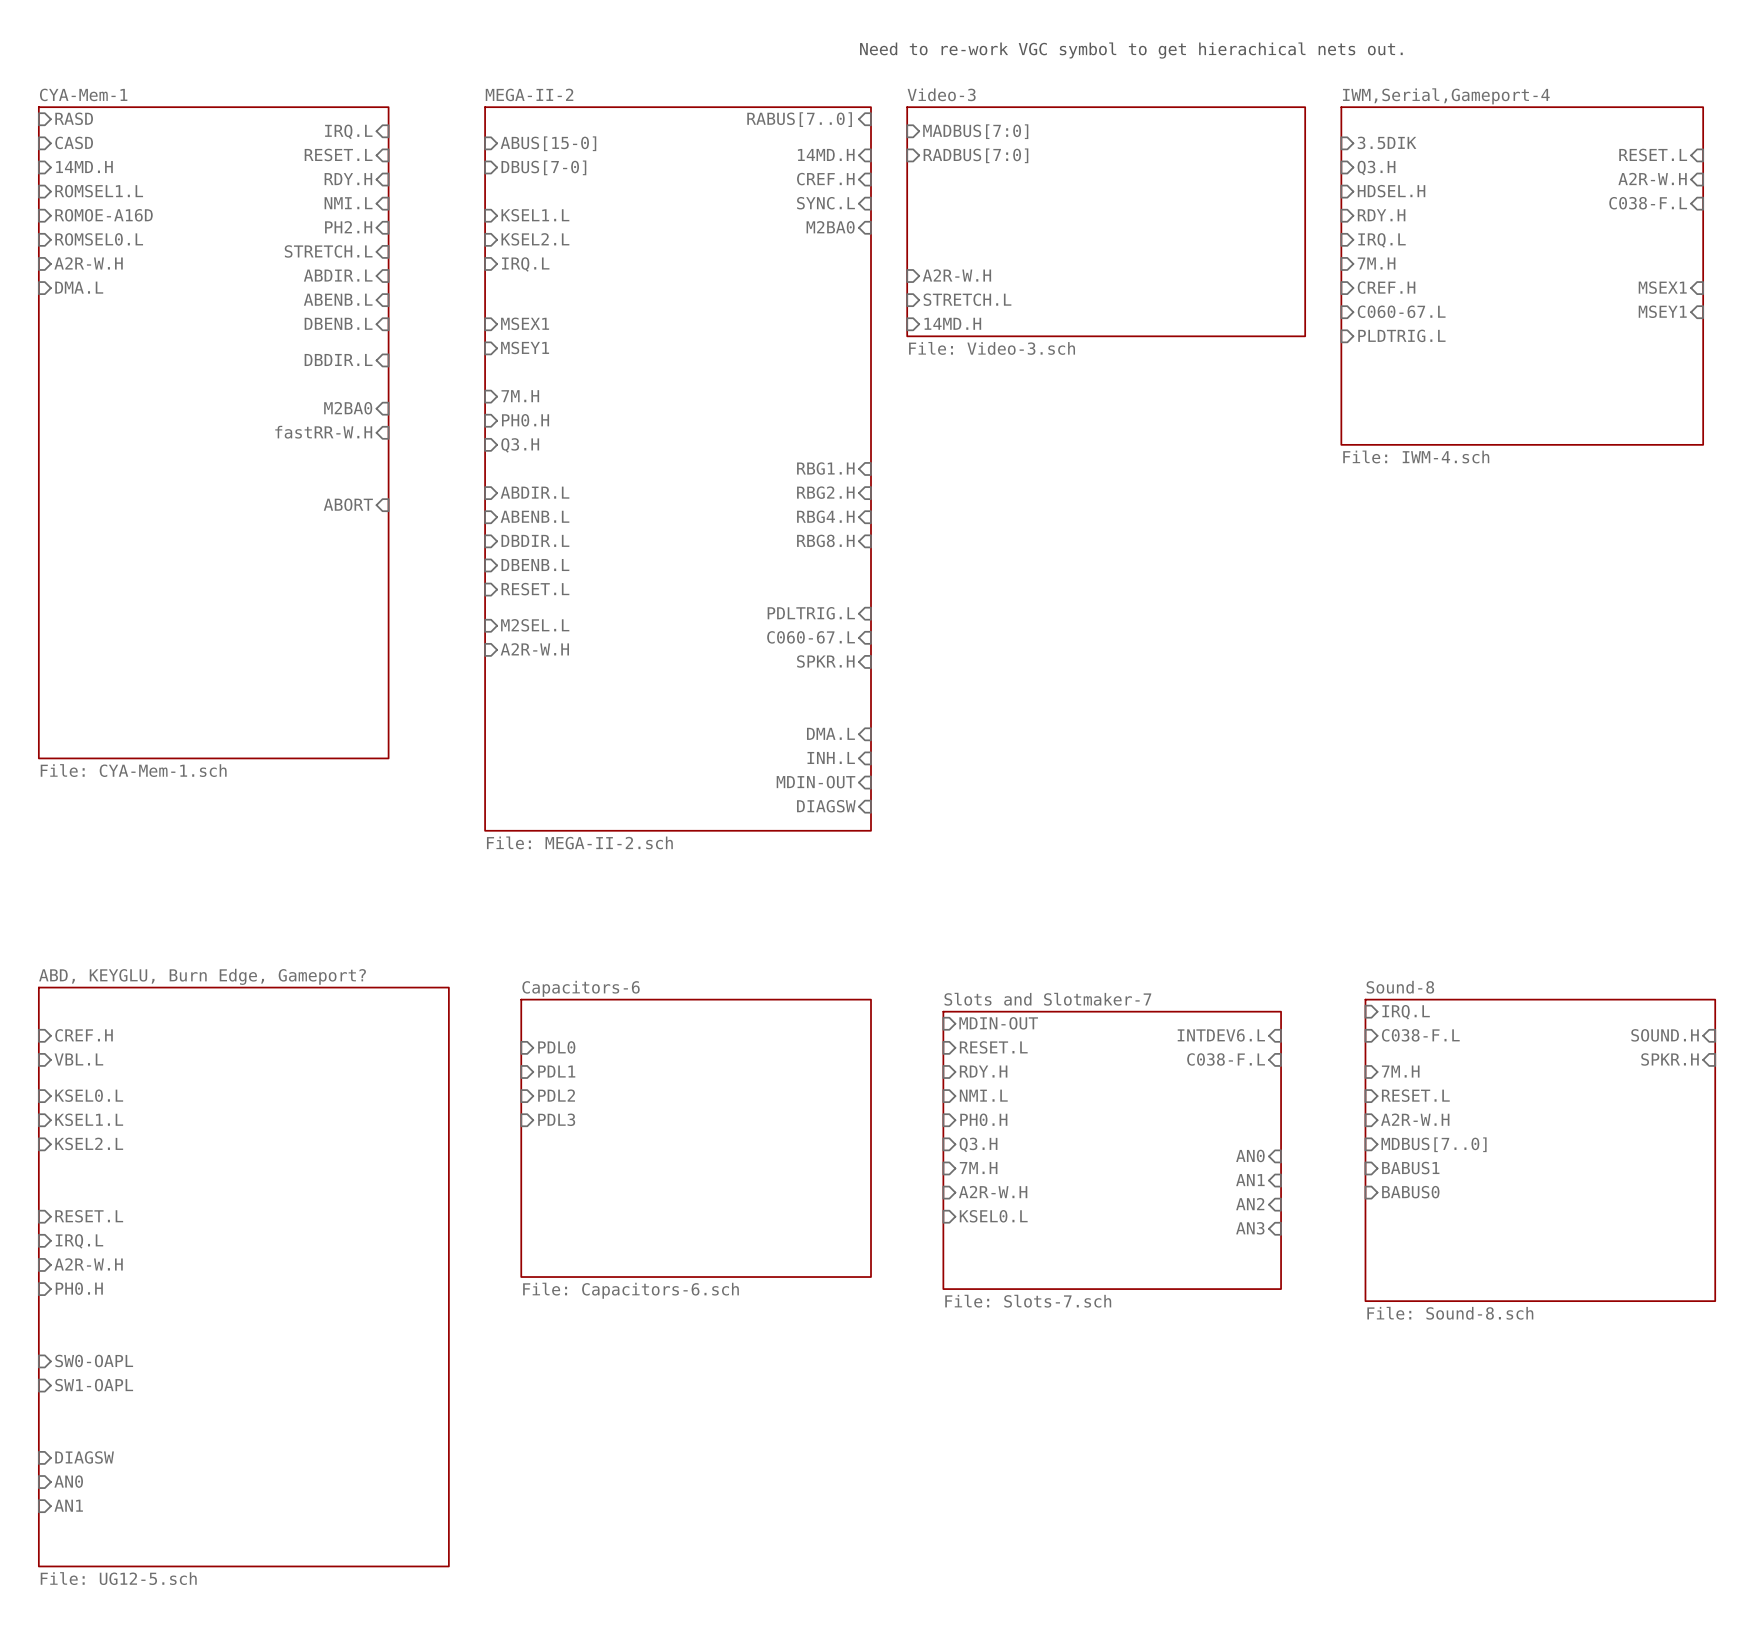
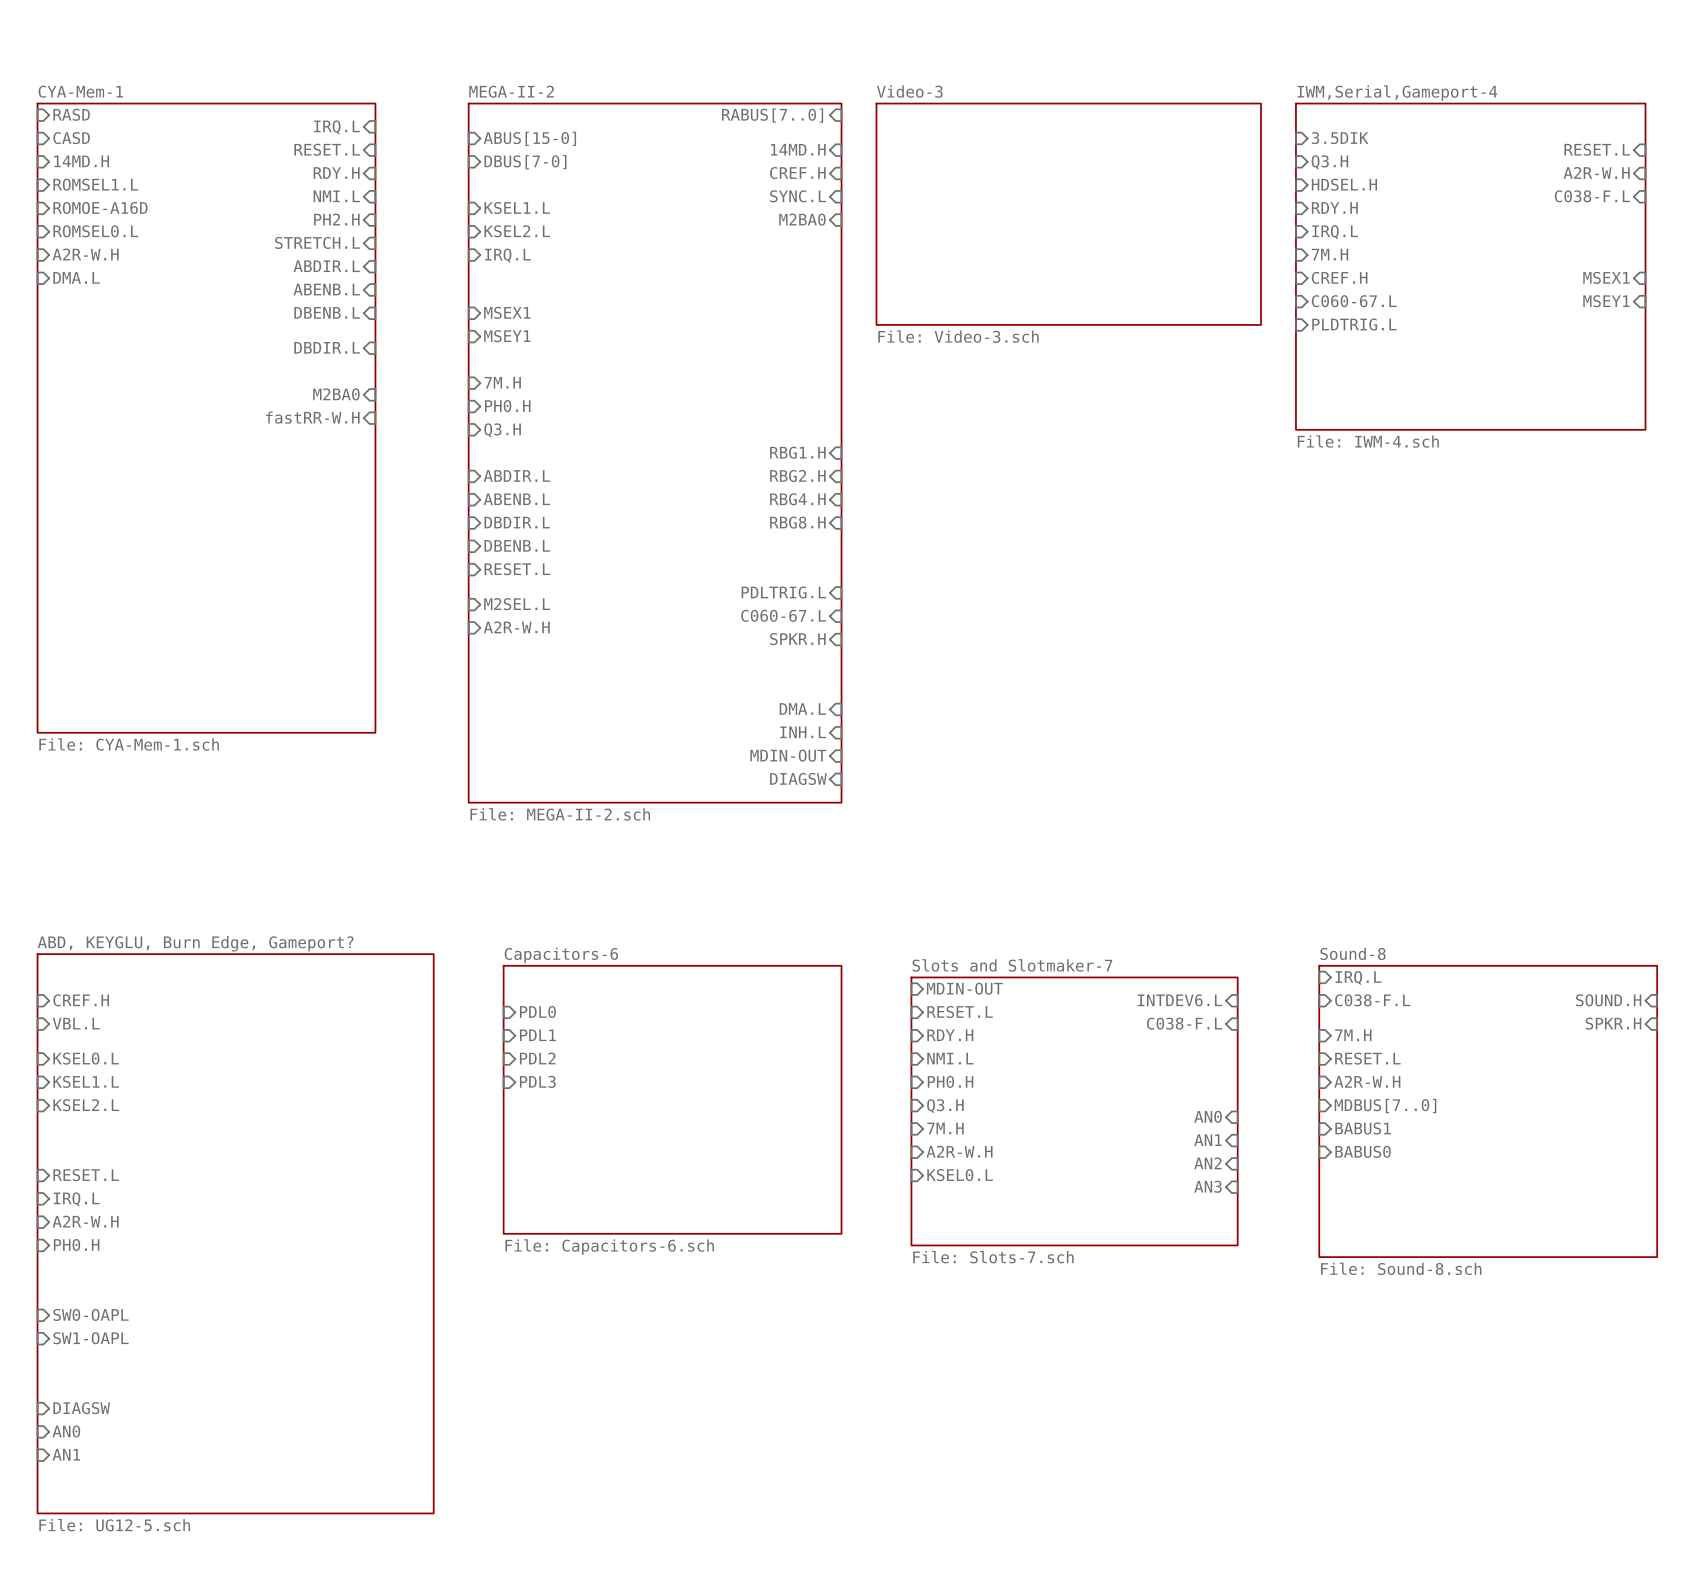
text: Need to re-work VGC symbol to get hierachical nets out. (1131, 50) -> none
sheet pin: MADBUS[7:0] (975, 131) -> none
sheet pin: RADBUS[7:0] (975, 155) -> none
sheet pin: A2R-W.H (956, 275) -> none
sheet pin: STRETCH.L (967, 299) -> none
sheet pin: 14MD.H (952, 323) -> none
sheet pin: ABORT (348, 504) -> none

